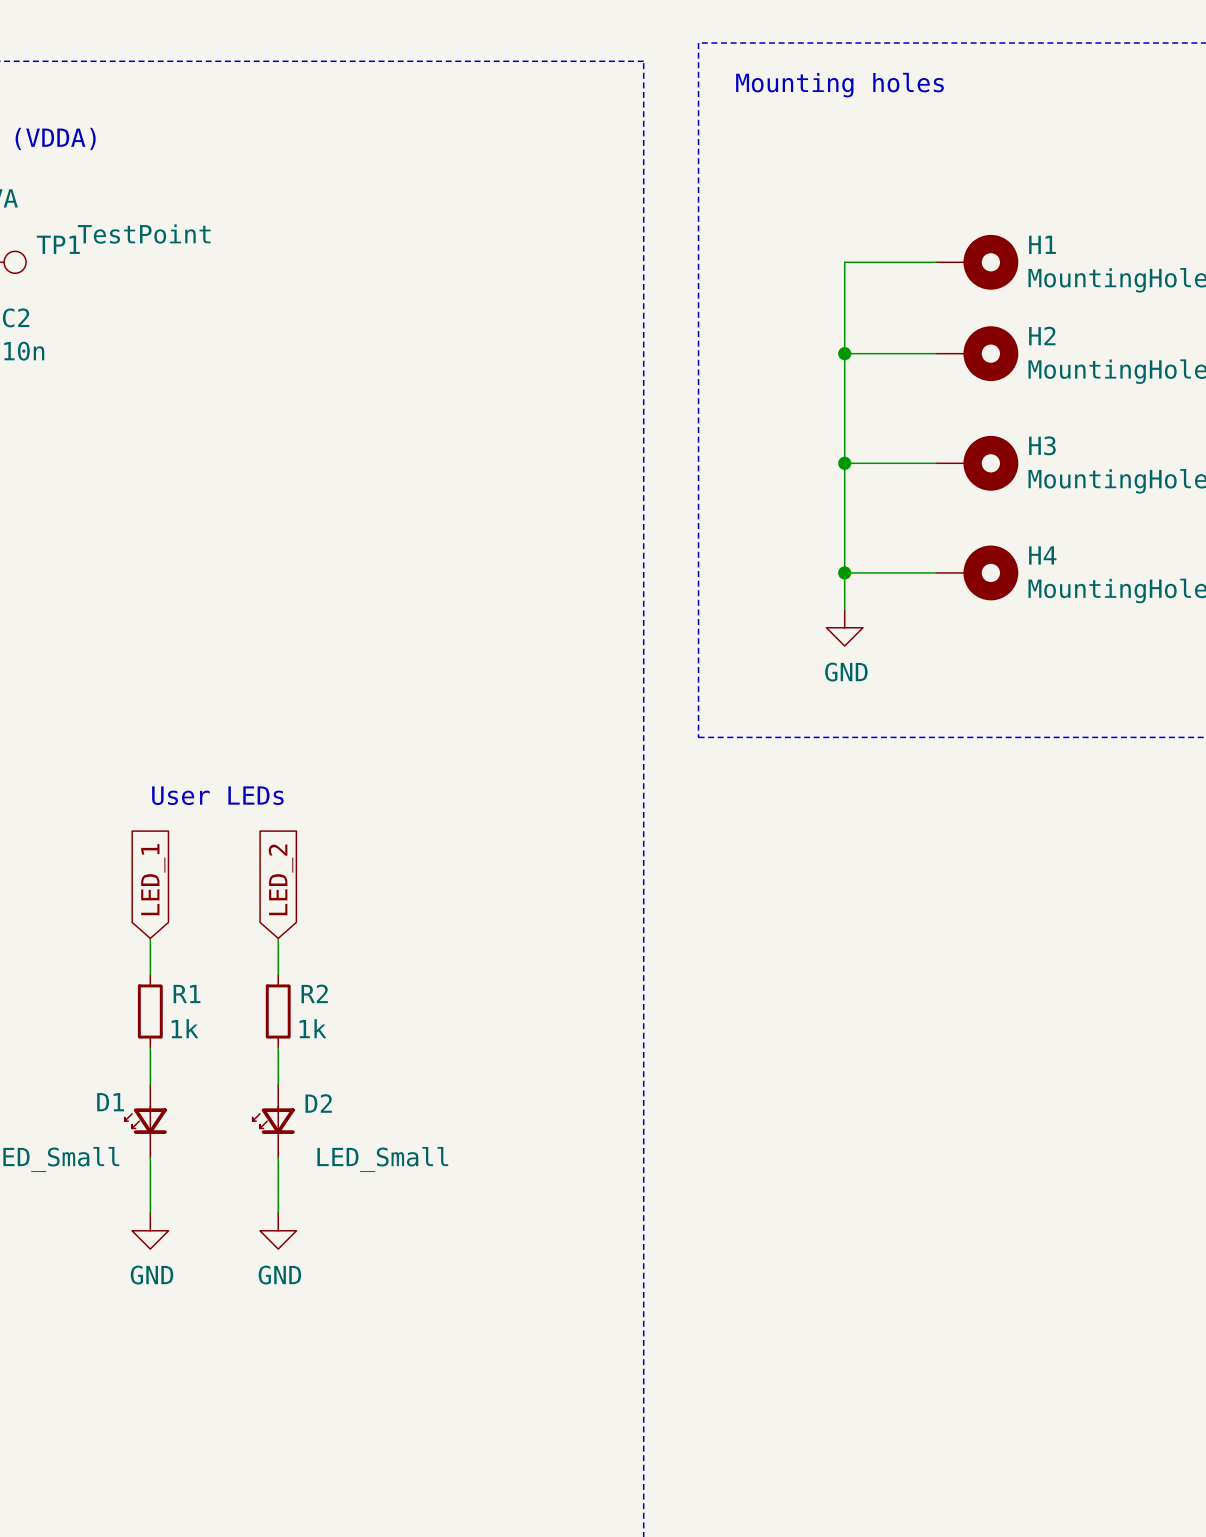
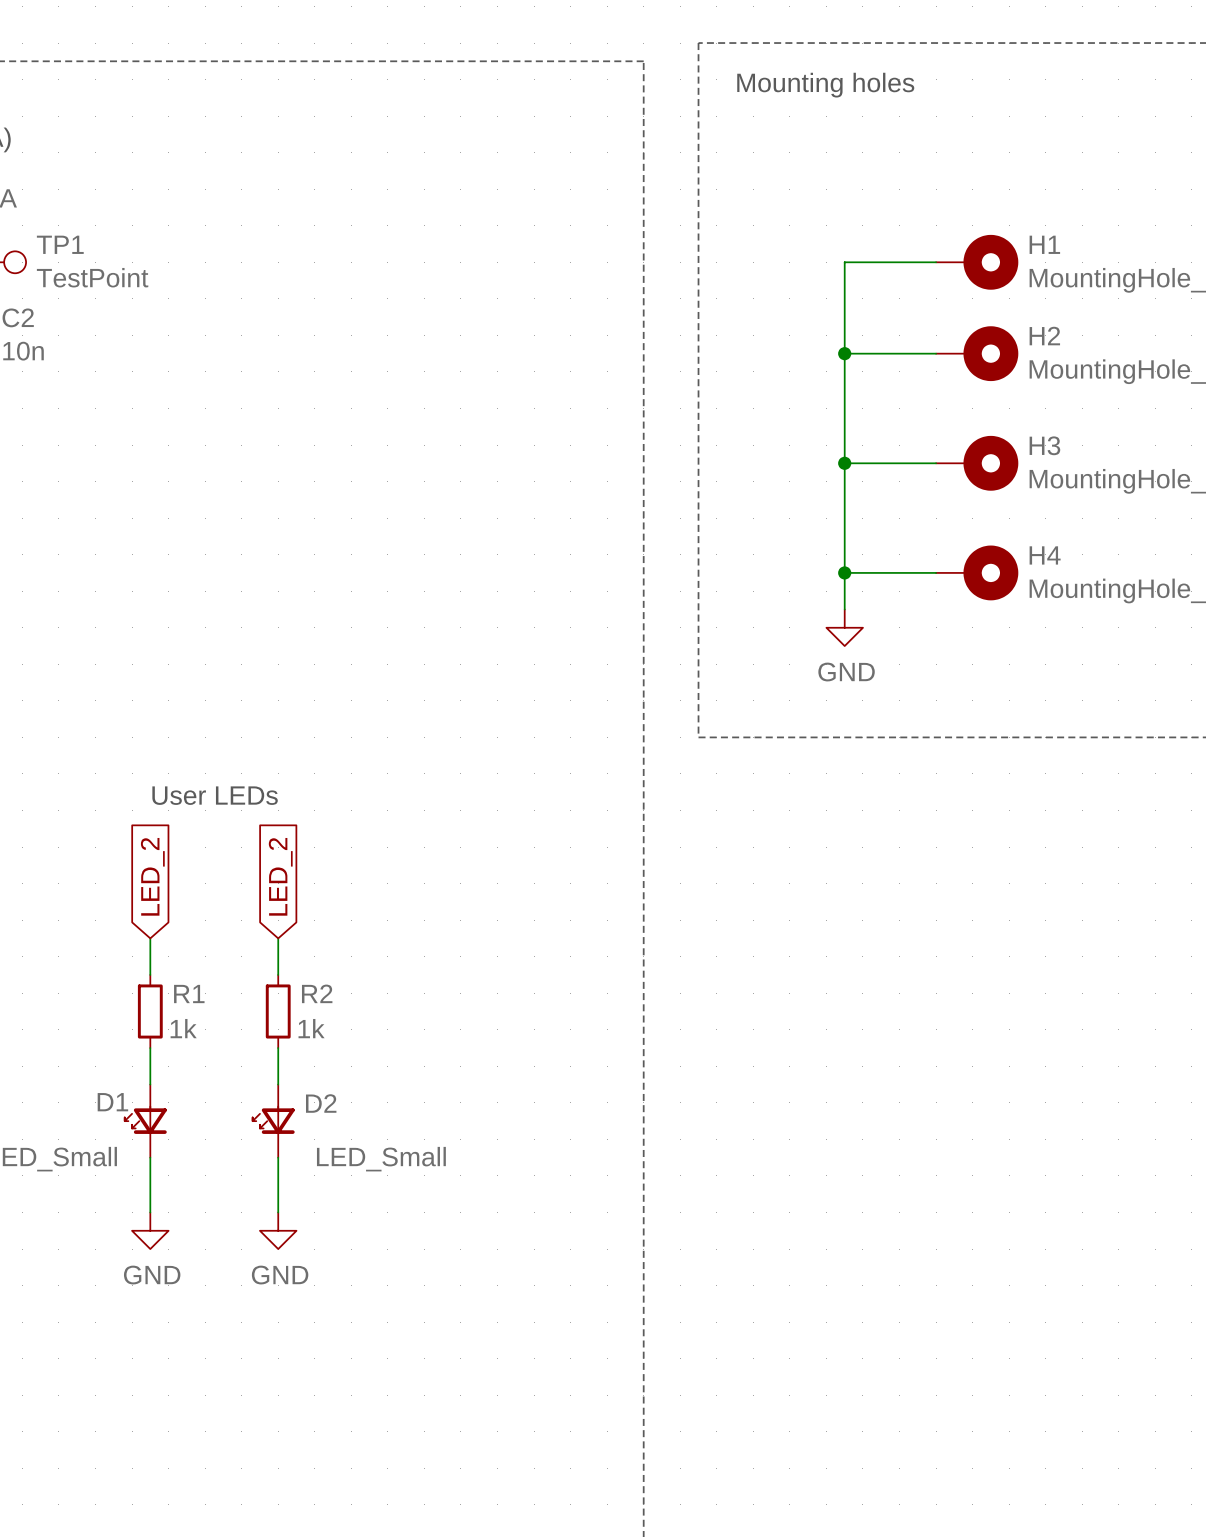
TP1 value position: TestPoint (144, 234) -> TestPoint (92, 277)
global label: LED_1 (153, 879) -> LED_2 (152, 876)

